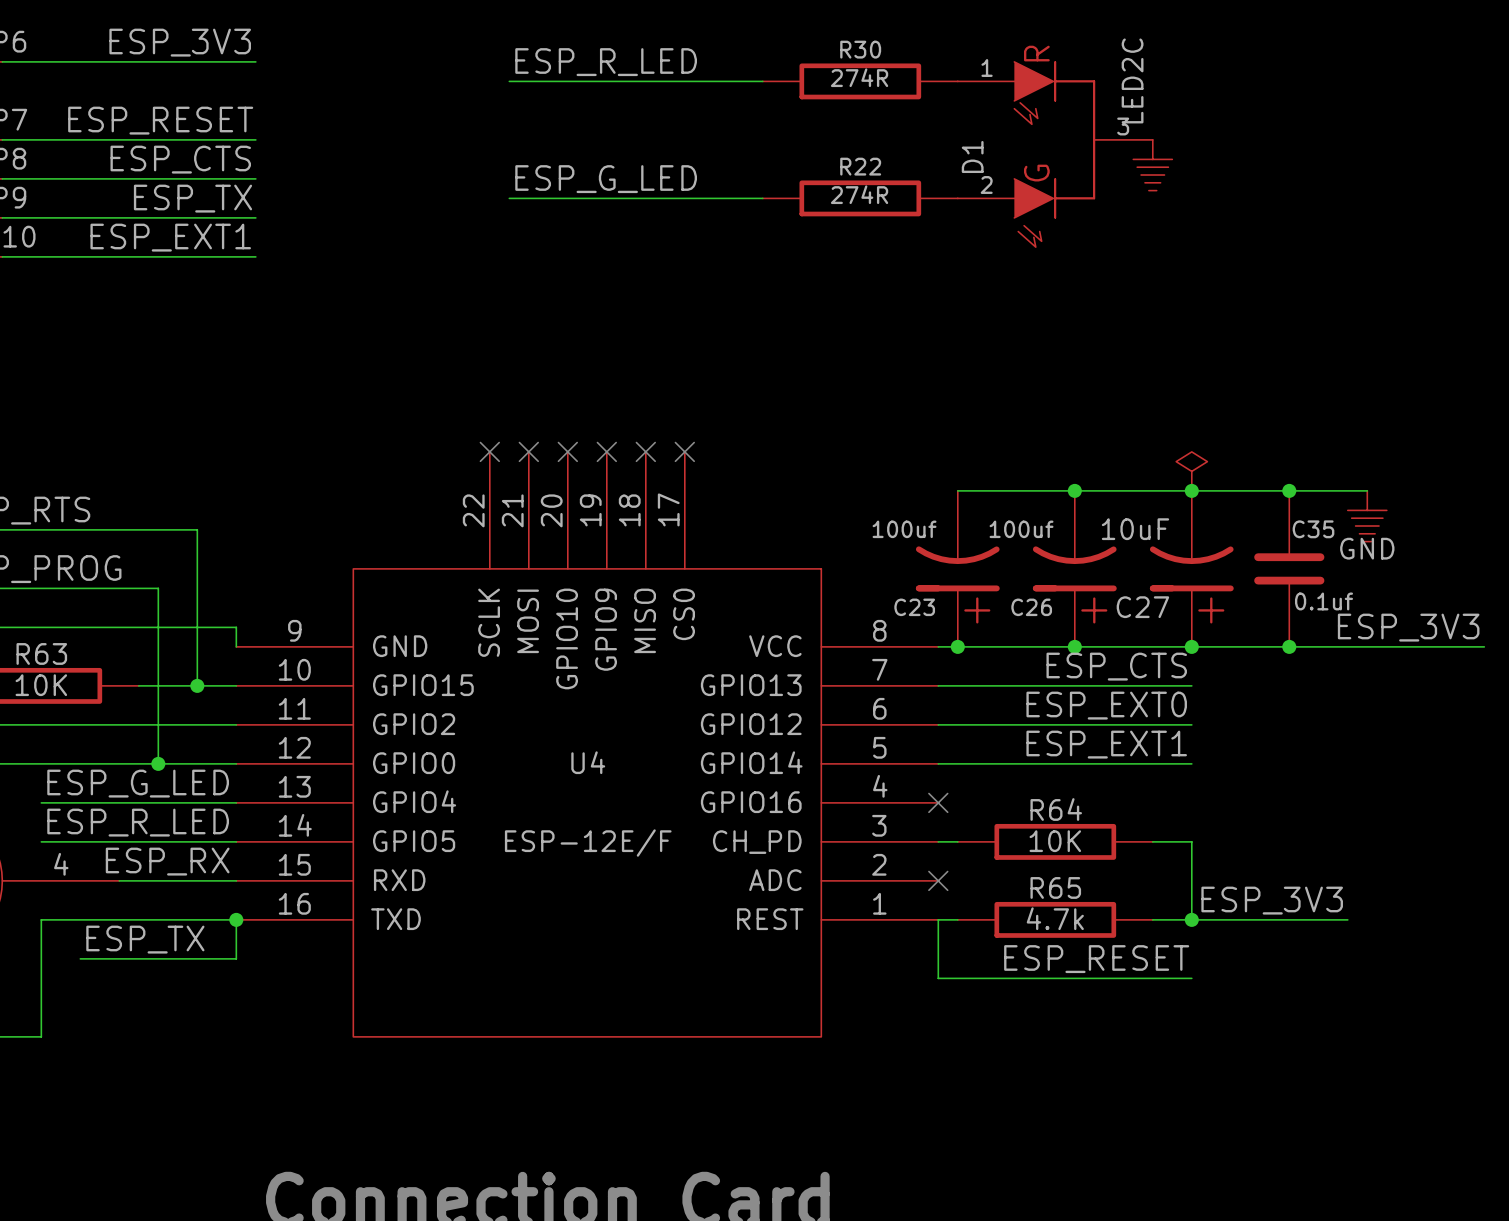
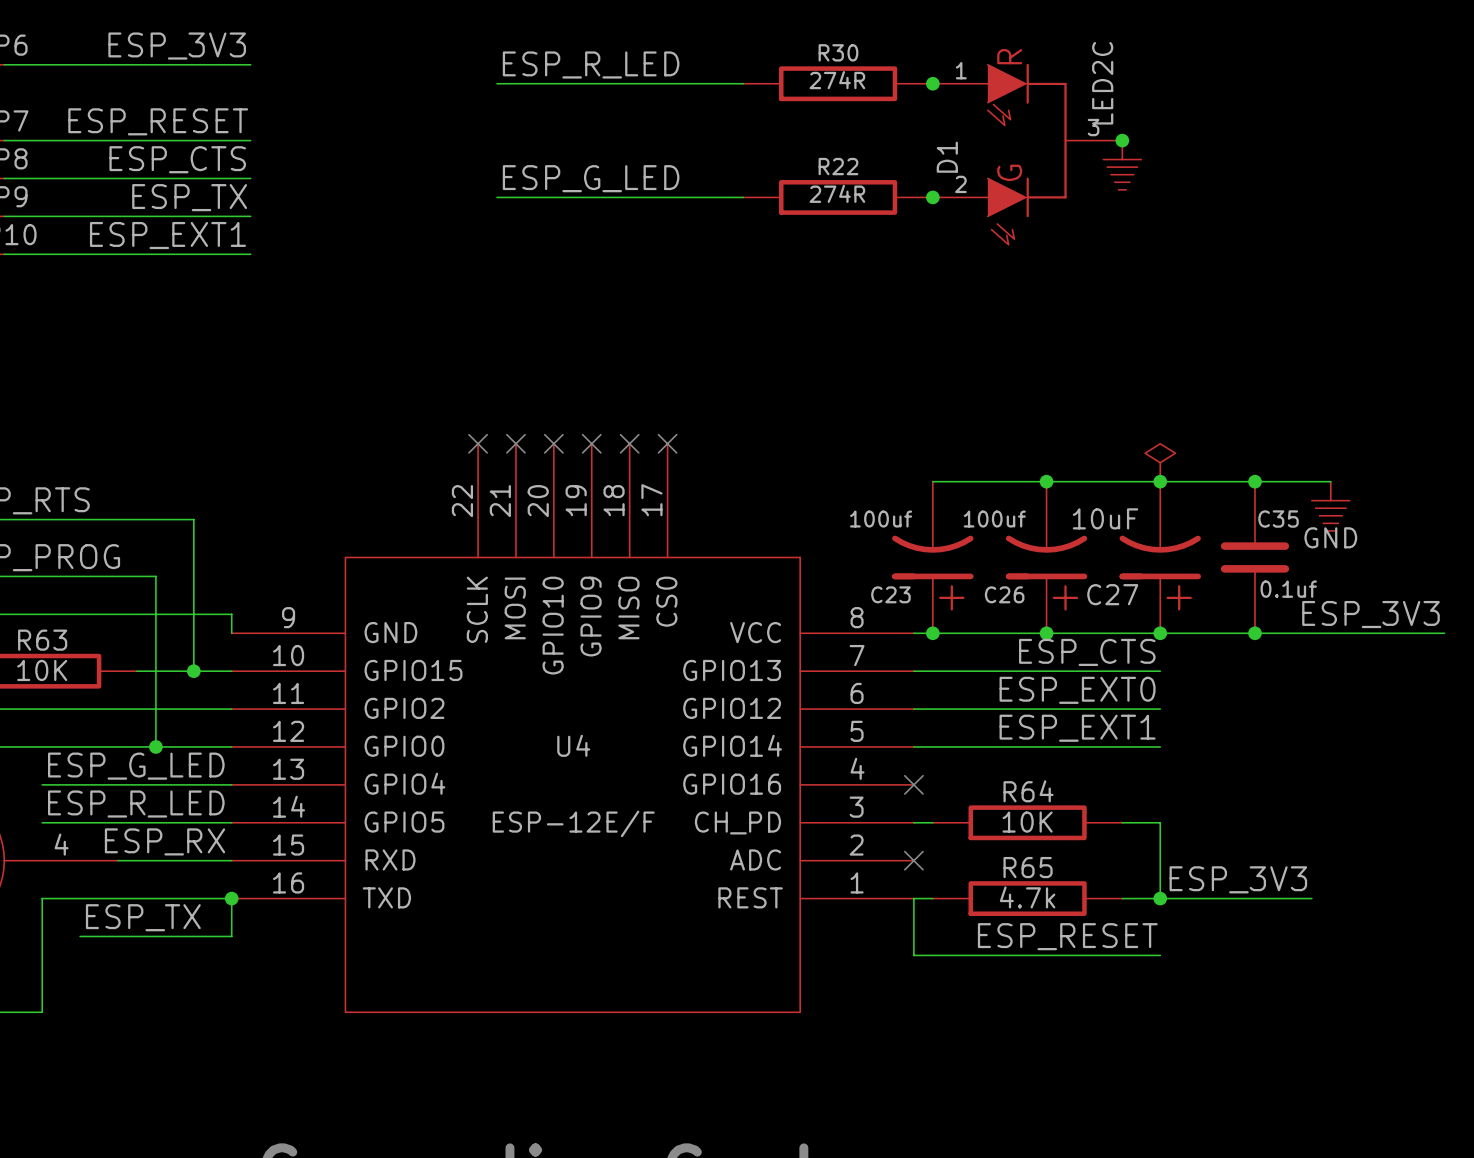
junction: none -> (932, 83)
junction: none -> (1122, 140)
junction: none -> (932, 197)

